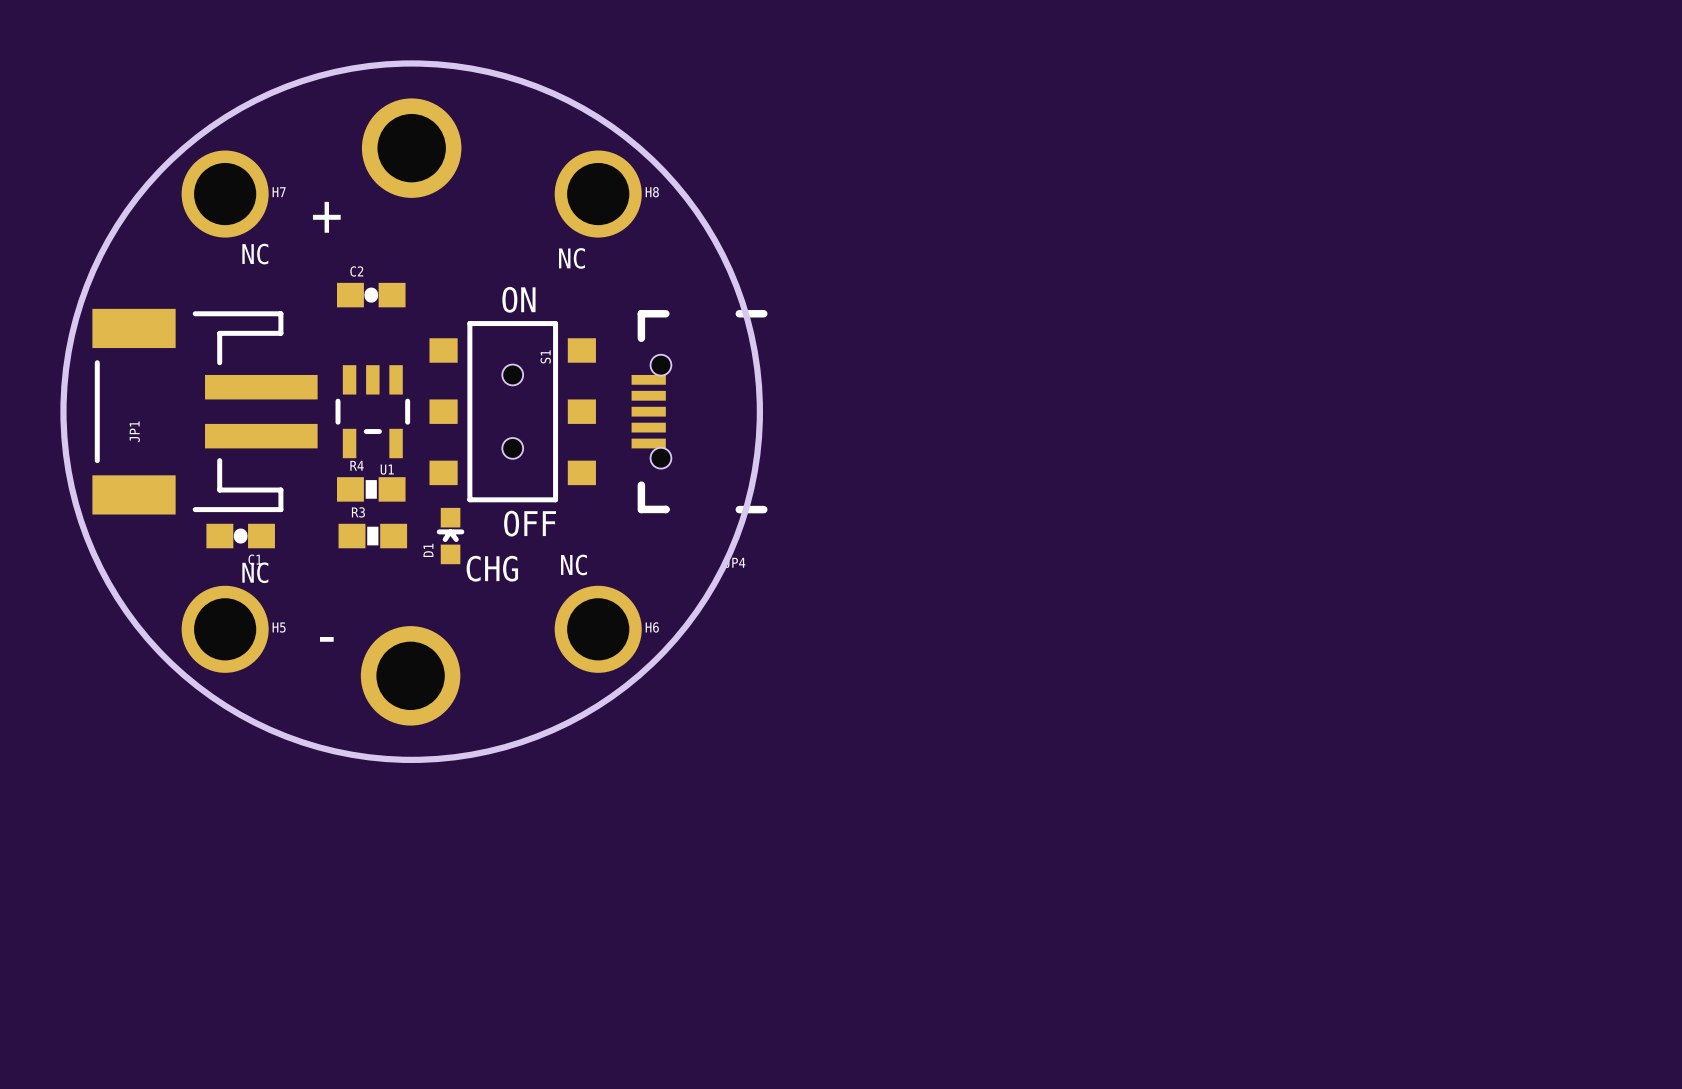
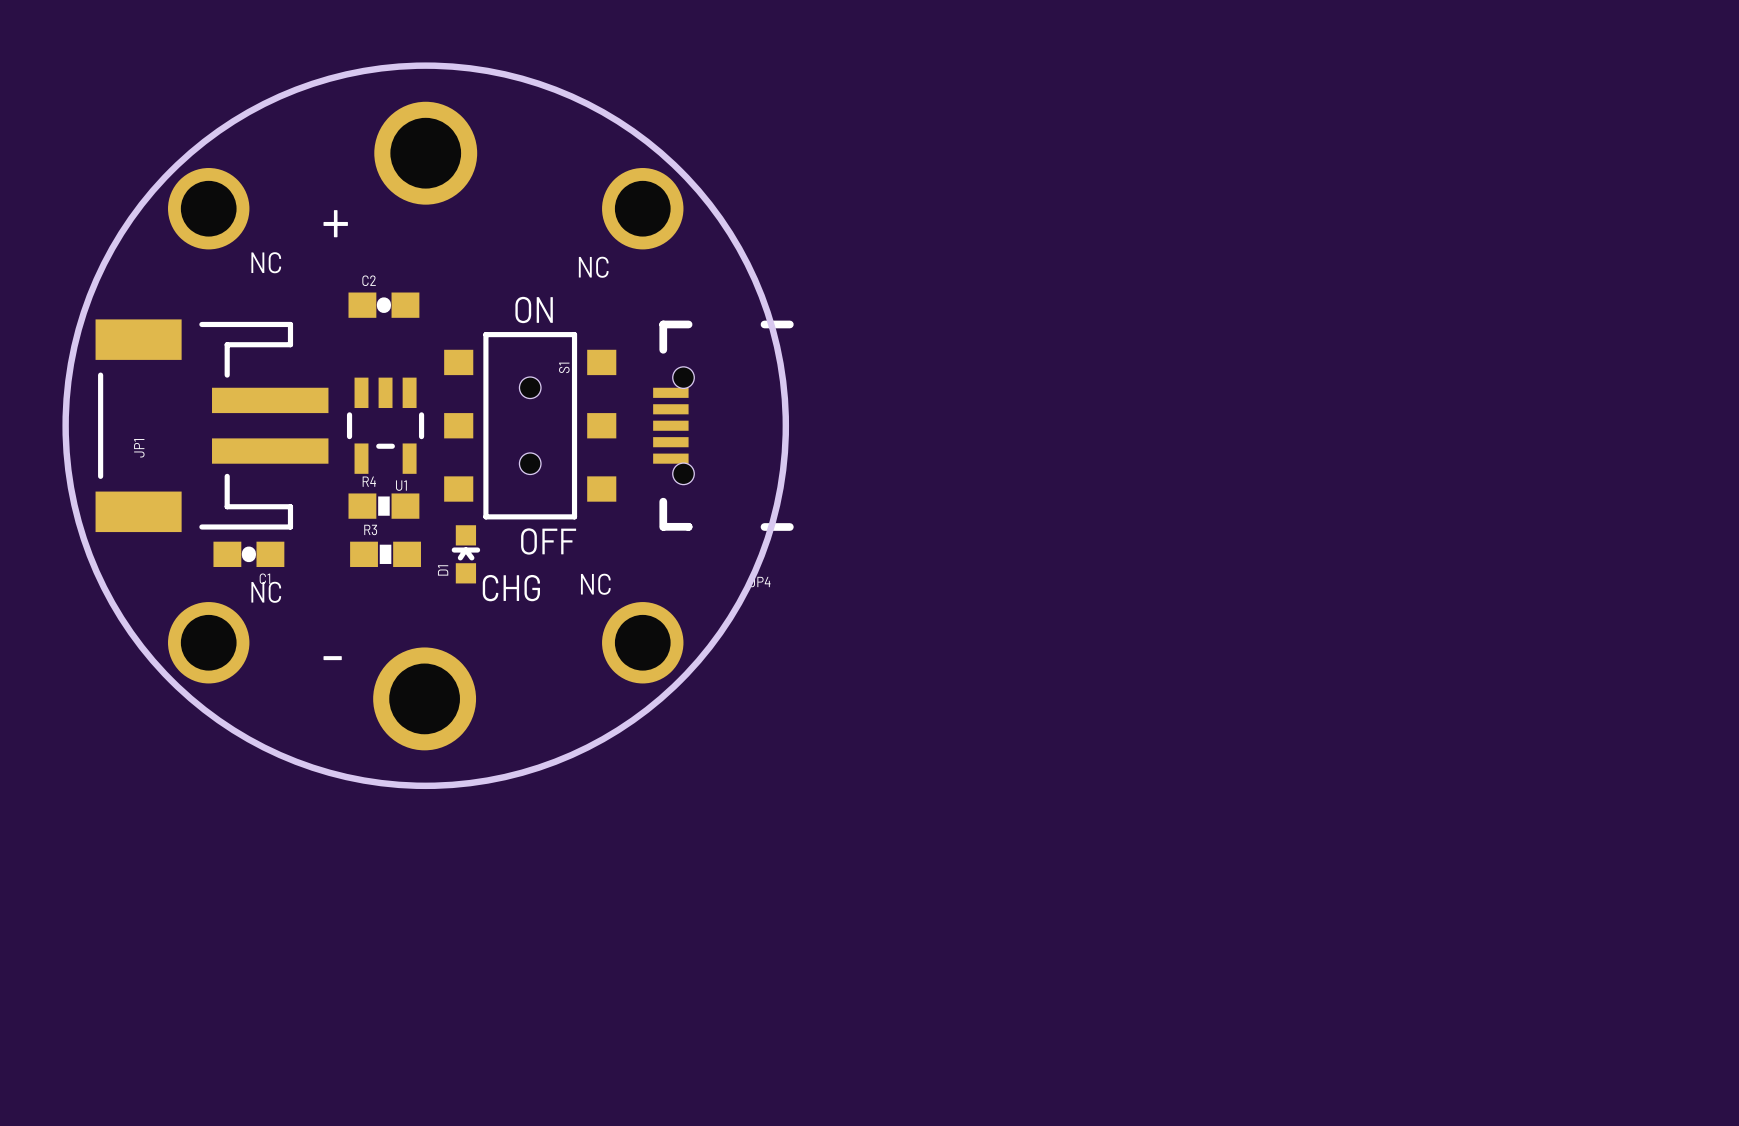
H7: (225, 194) -> none
H8: (598, 194) -> none
part: none -> (208, 208)
part: none -> (642, 208)
part: none -> (208, 642)
part: none -> (642, 642)
H5: (225, 629) -> none
H6: (598, 629) -> none

